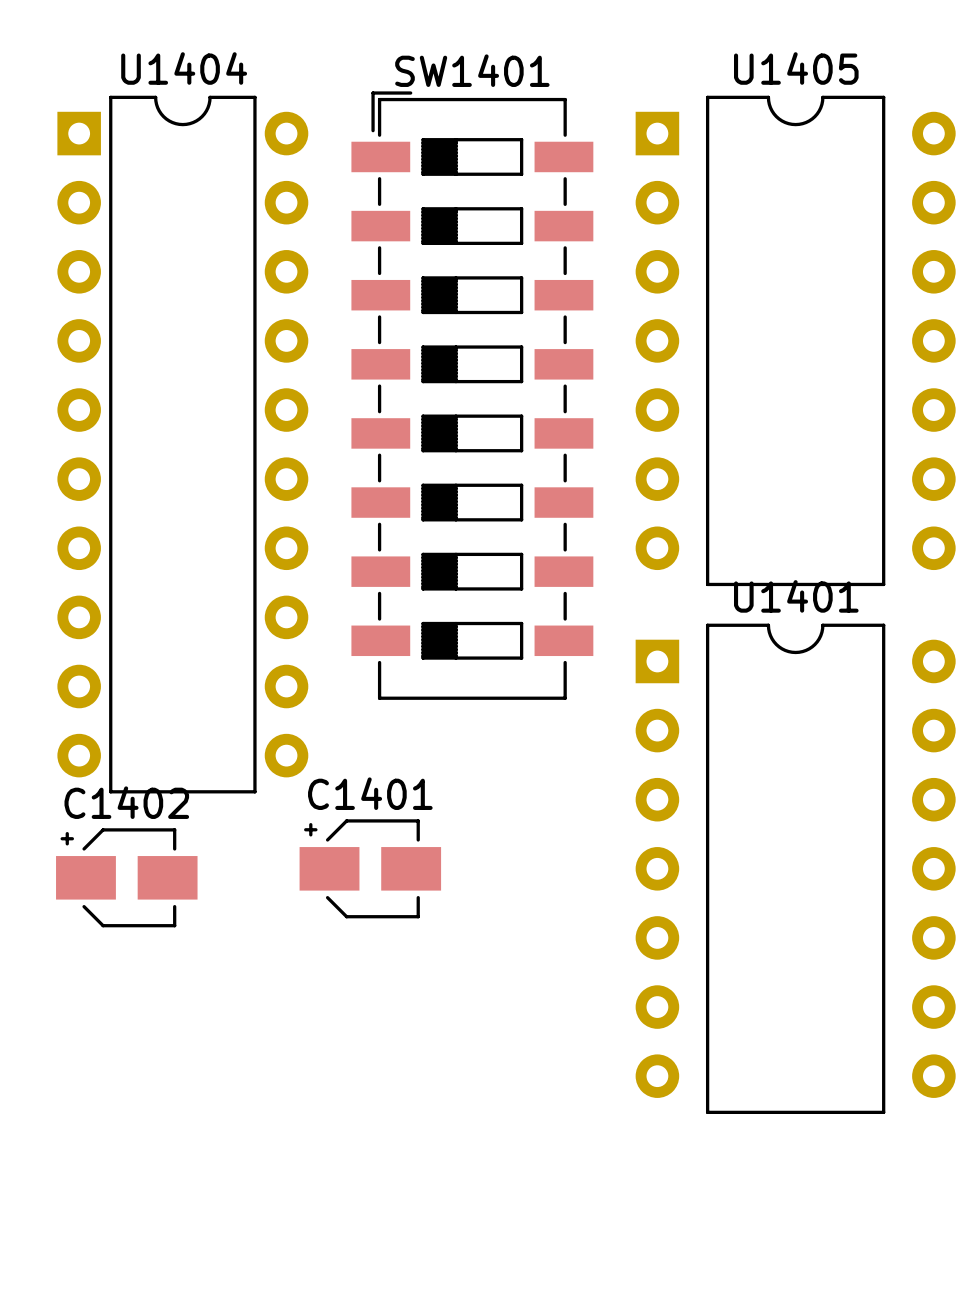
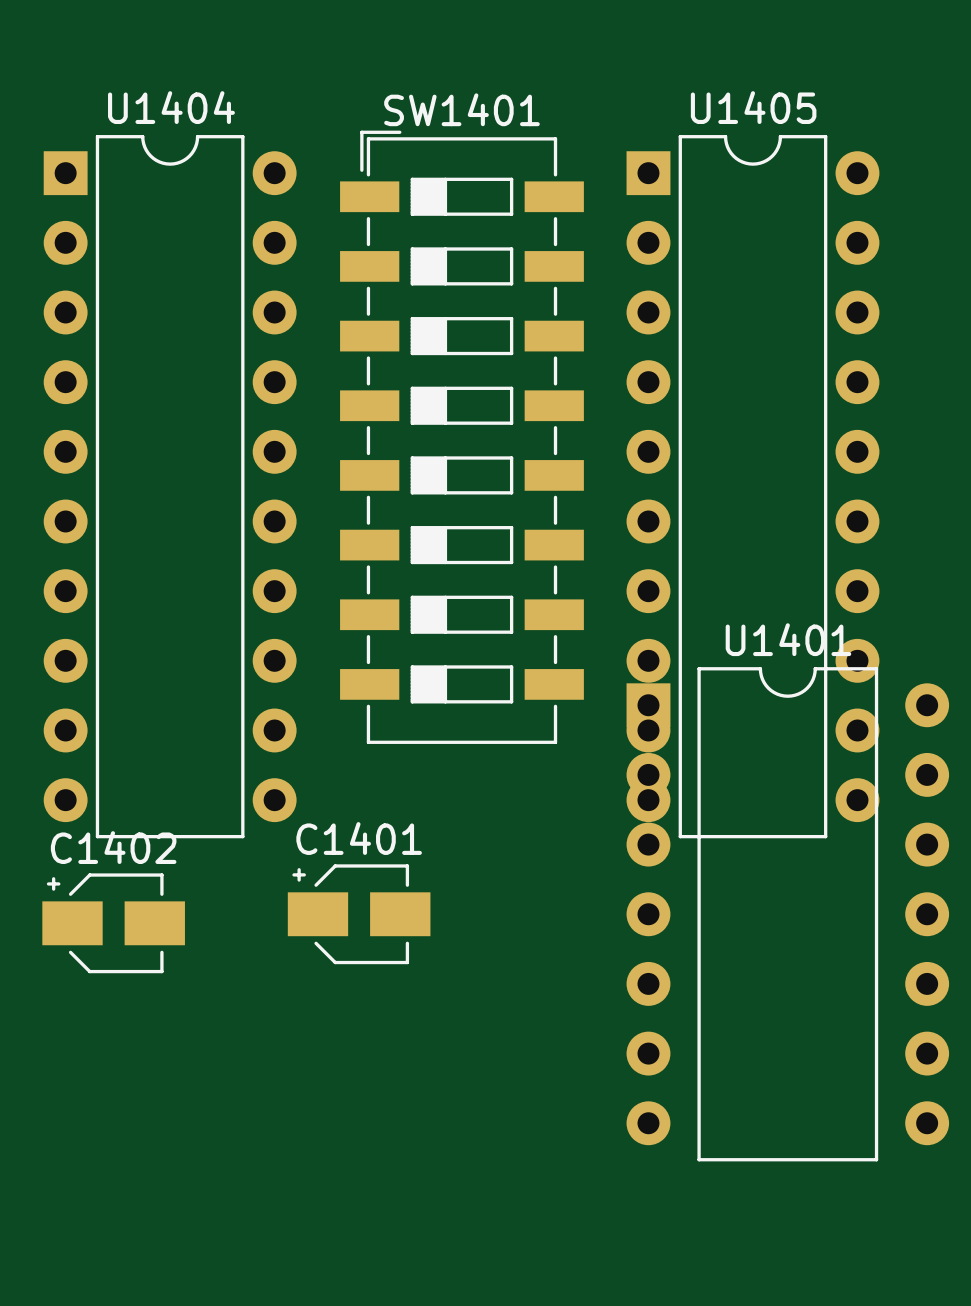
U1405 name position: U1405 (796, 68) -> U1405 (753, 107)
U1405 footprint: [635, 95, 956, 587] -> [626, 135, 880, 839]

